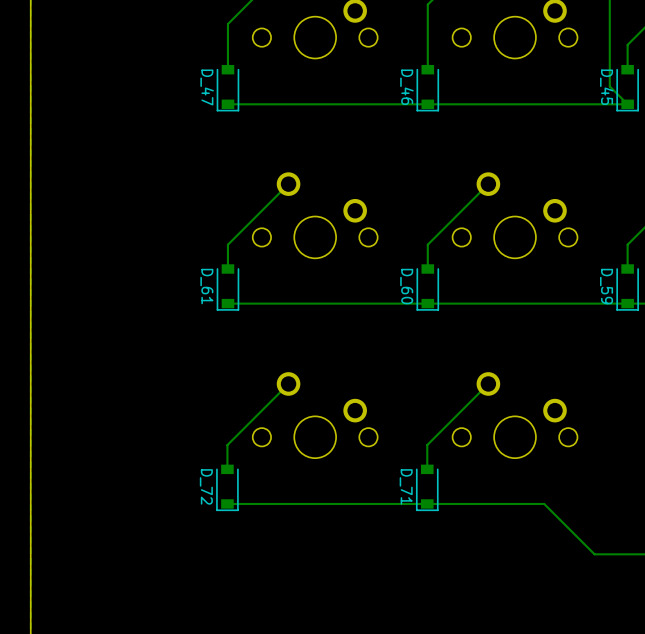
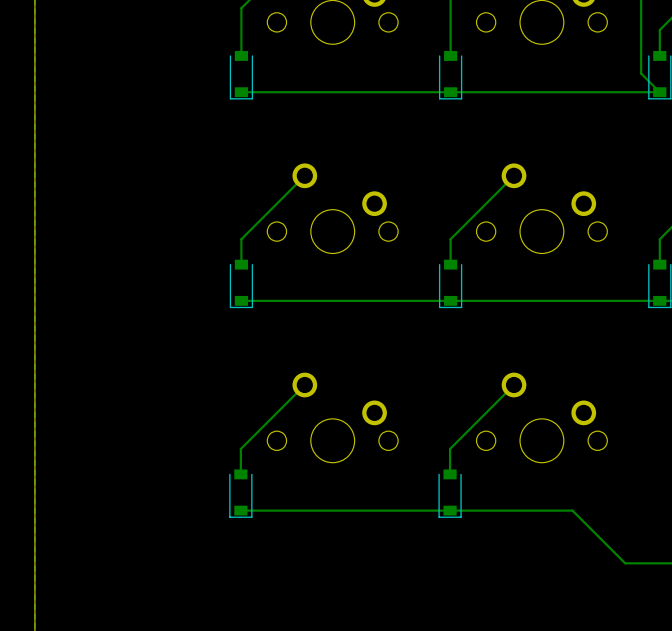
D_47 name: D_47 (207, 87) -> none
D_46 name: D_46 (406, 87) -> none
D_45 name: D_45 (606, 87) -> none
D_61 name: D_61 (206, 286) -> none
D_60 name: D_60 (406, 286) -> none
D_59 name: D_59 (606, 286) -> none
D_72 name: D_72 (206, 486) -> none
D_71 name: D_71 (406, 486) -> none

